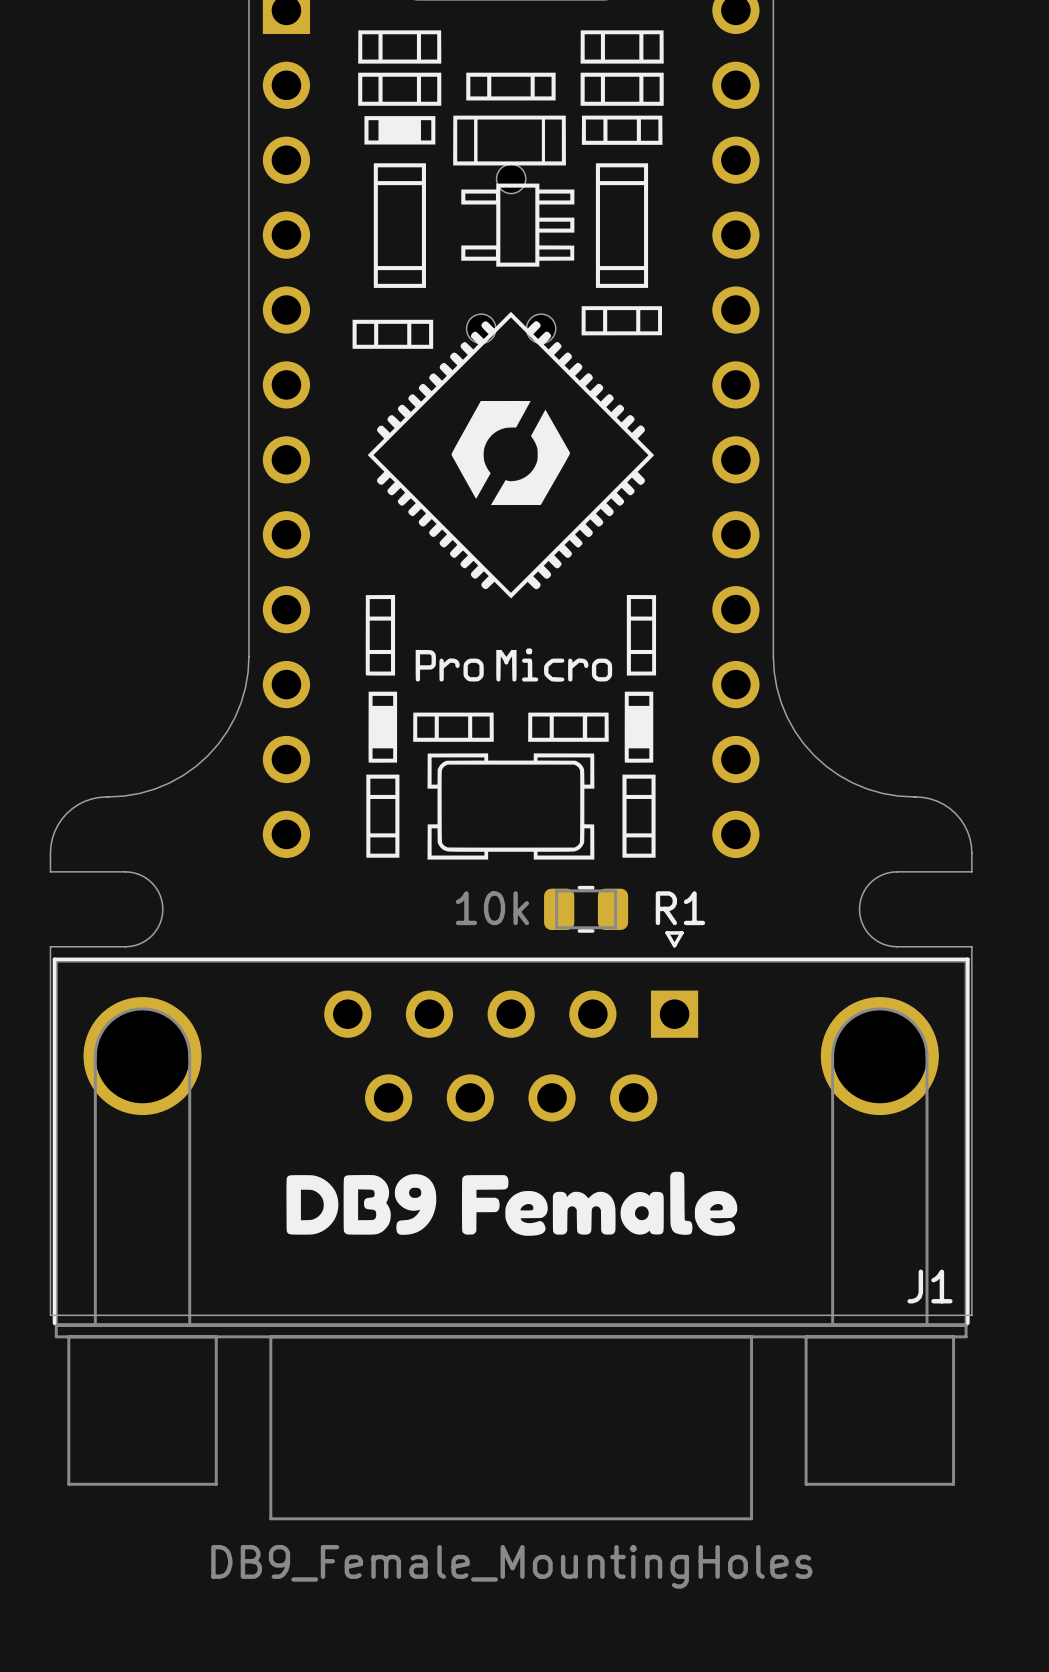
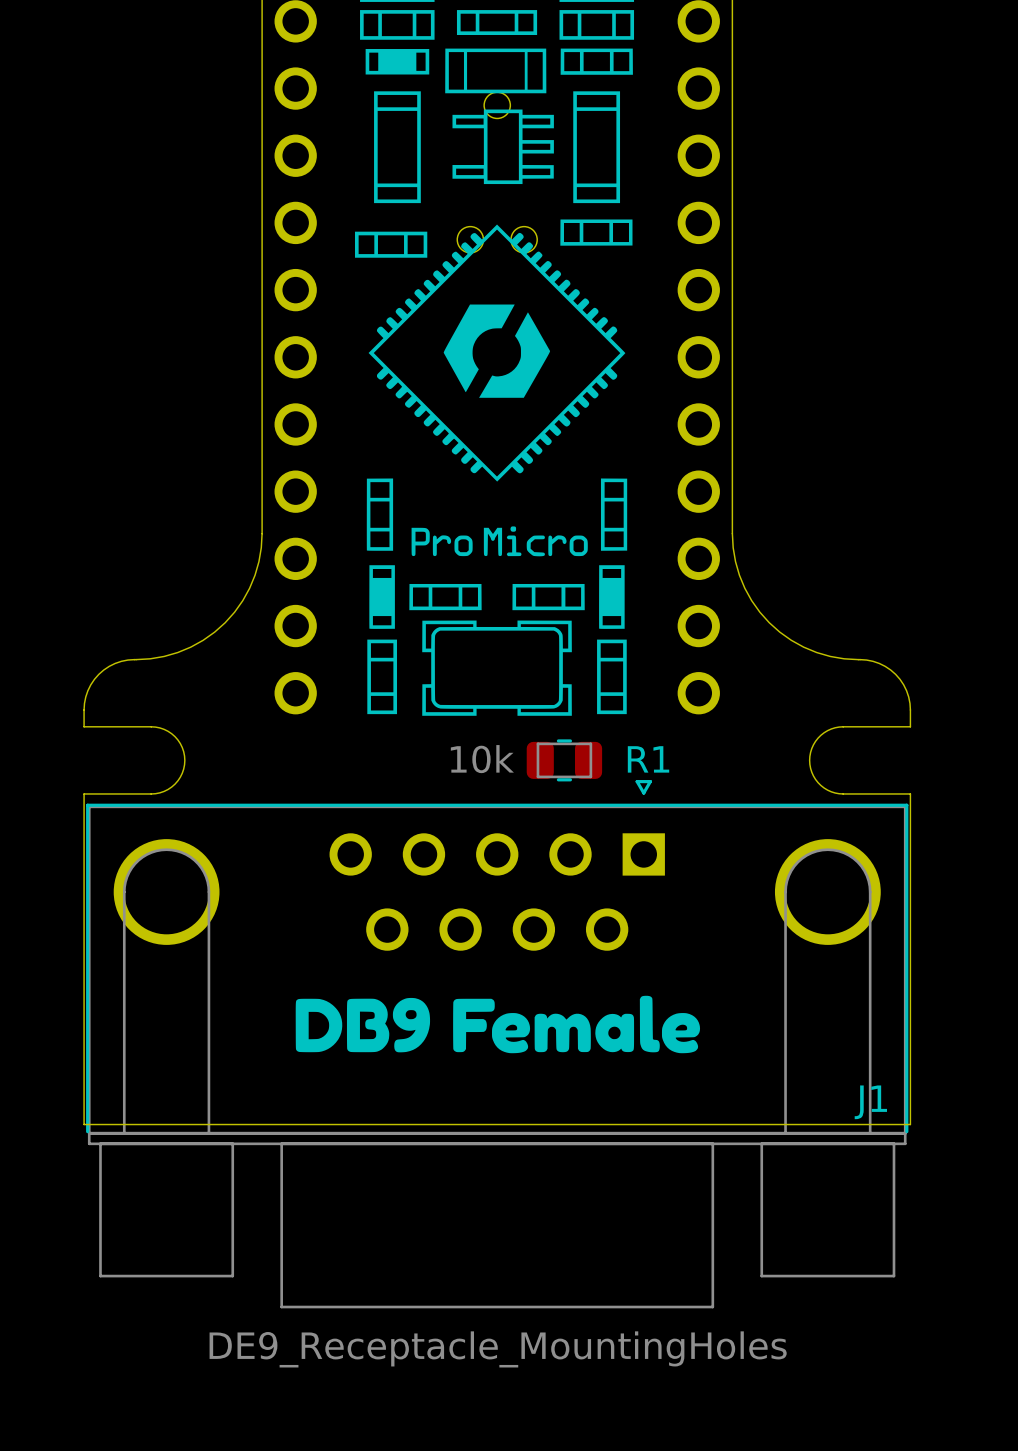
J1 value: DB9_Female_MountingHoles (511, 1566) -> DE9_Receptacle_MountingHoles (498, 1349)

